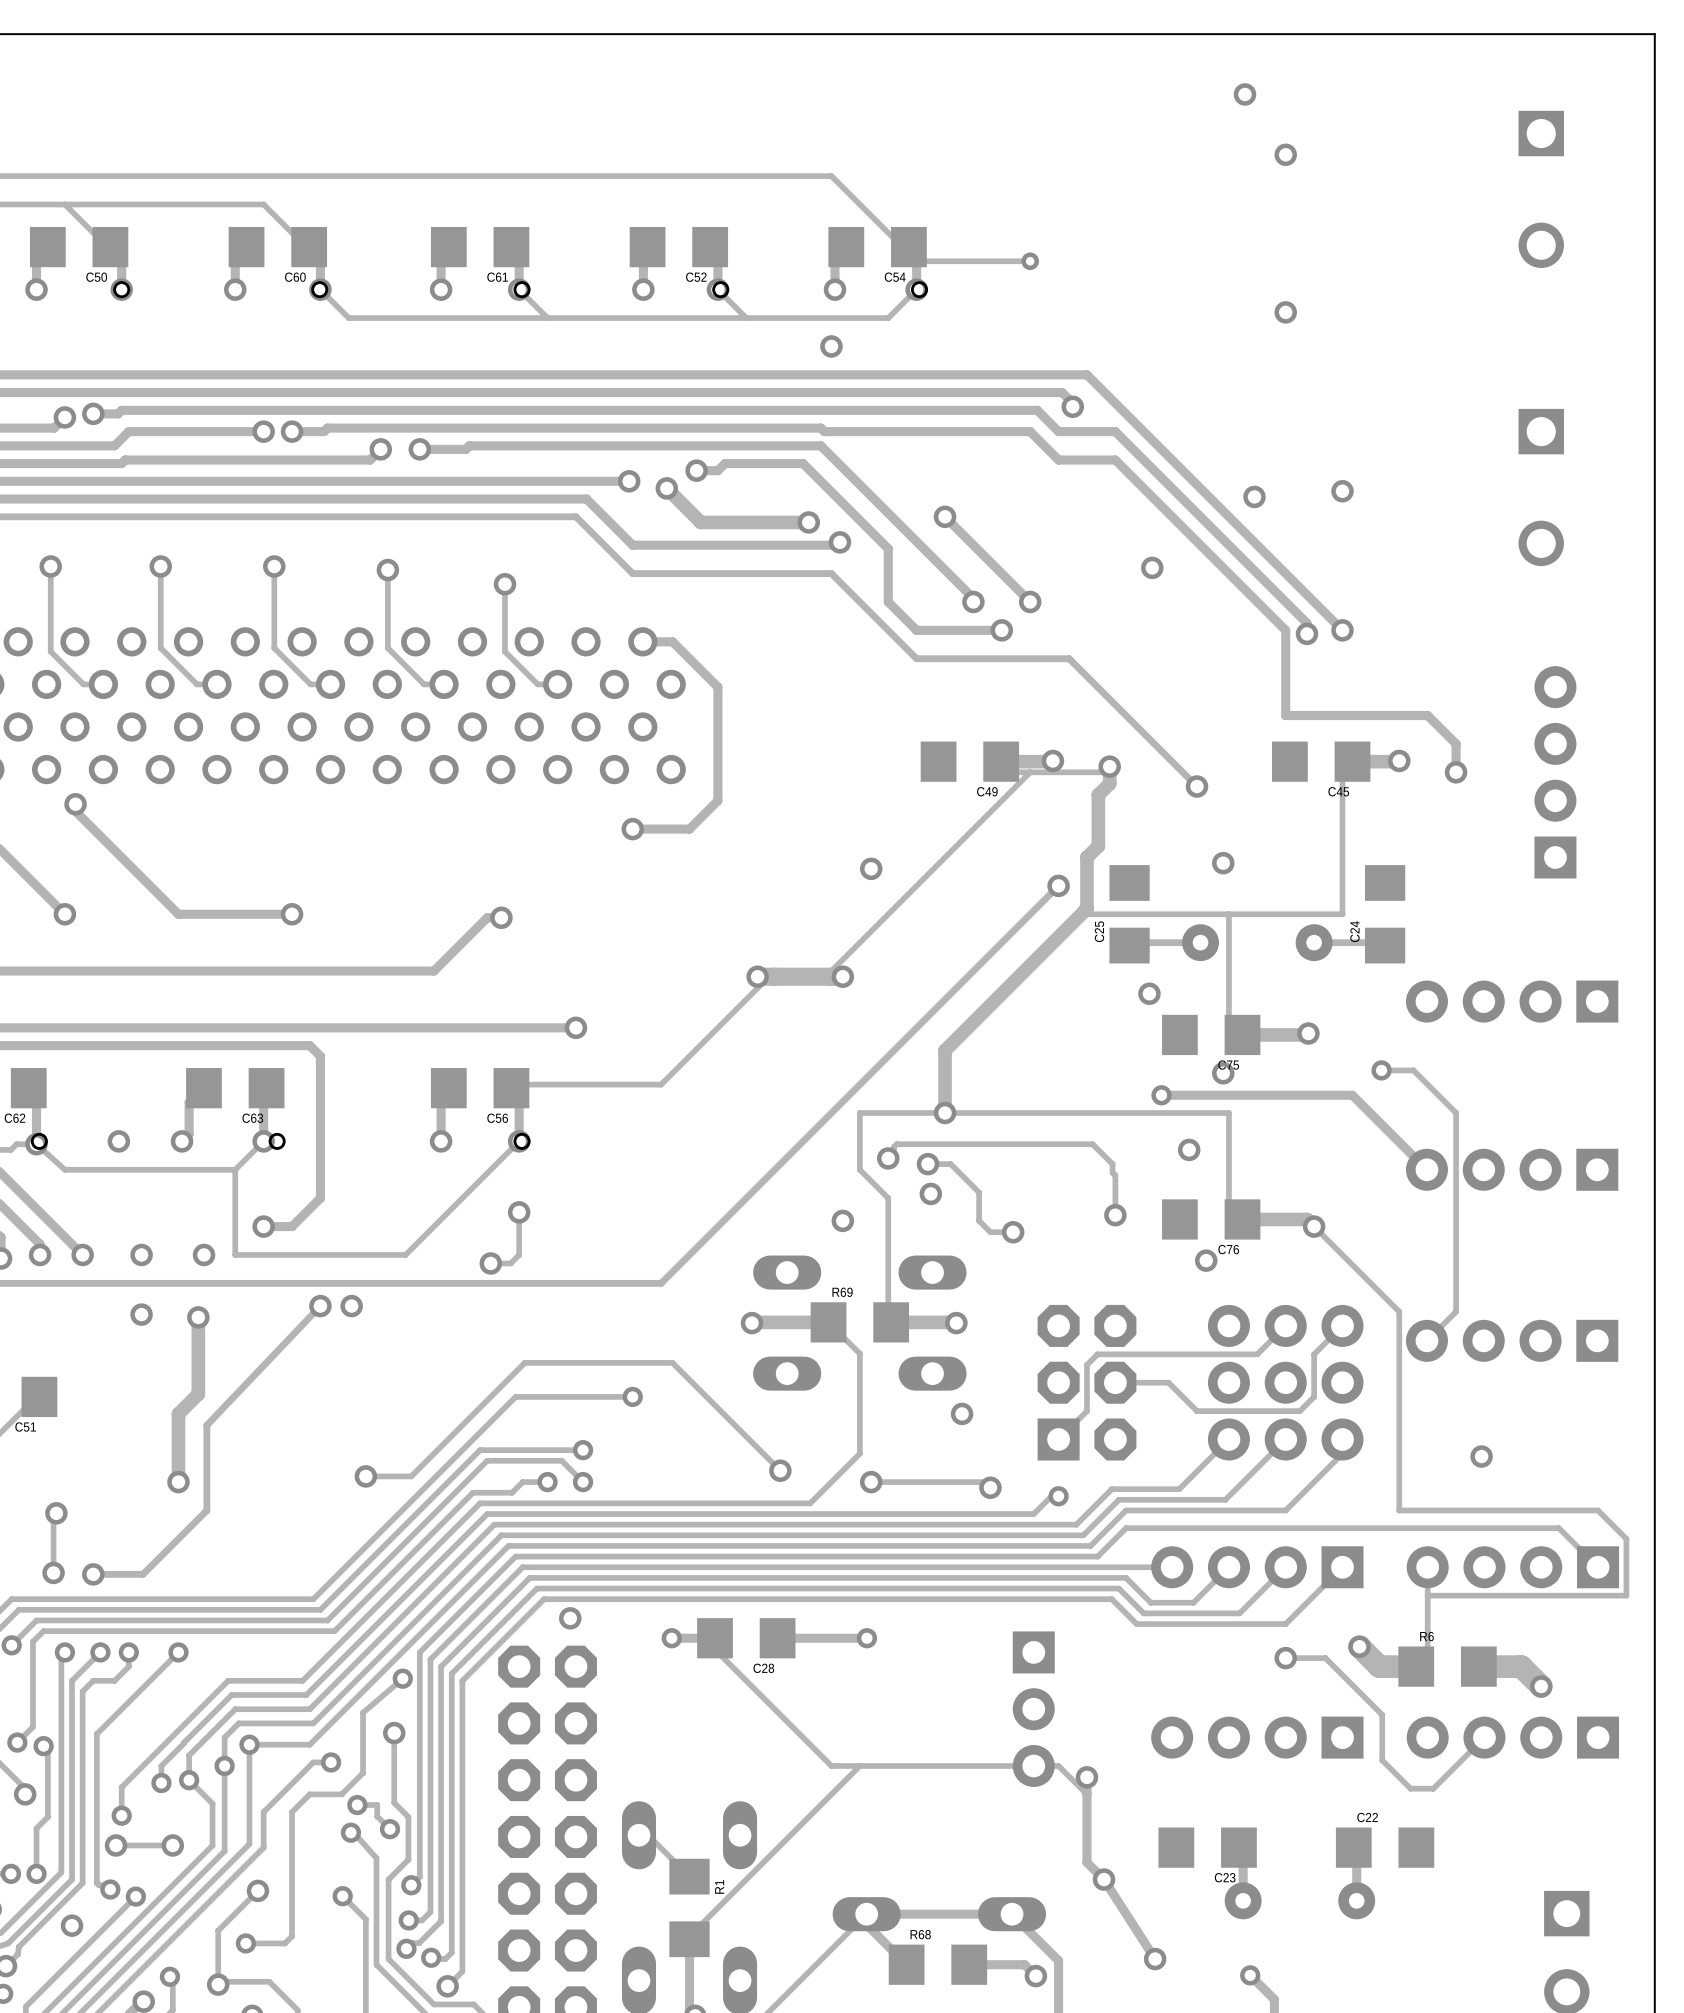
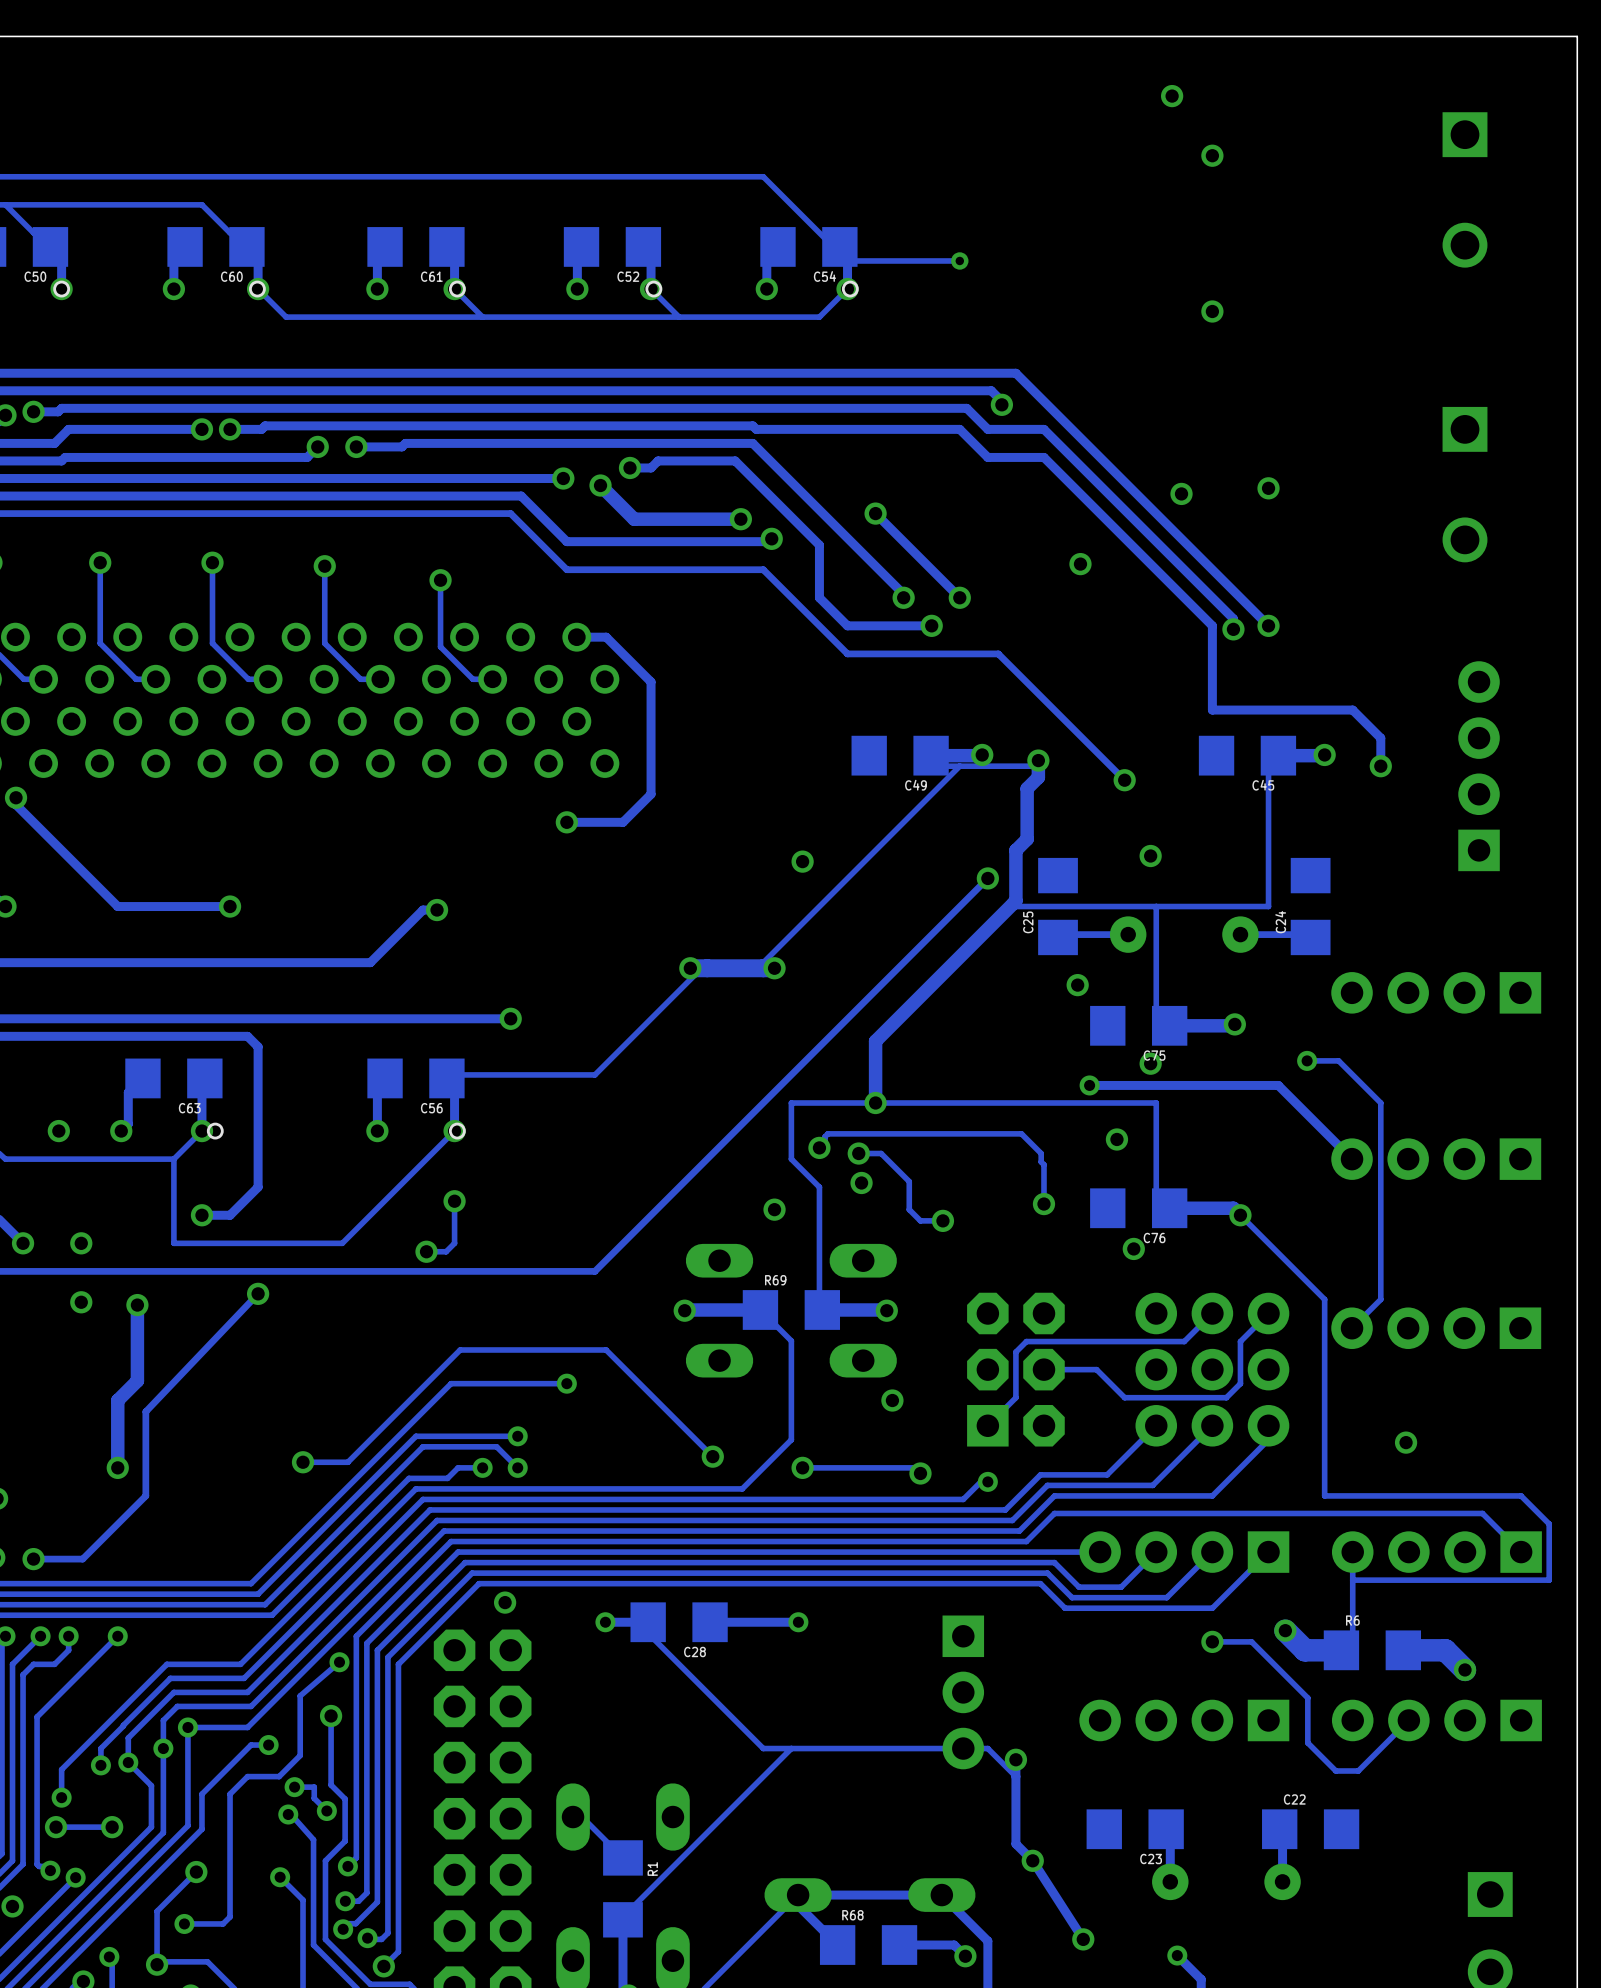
via: (831, 346) -> none
via: (204, 1254) -> none
via: (351, 1306) -> none

